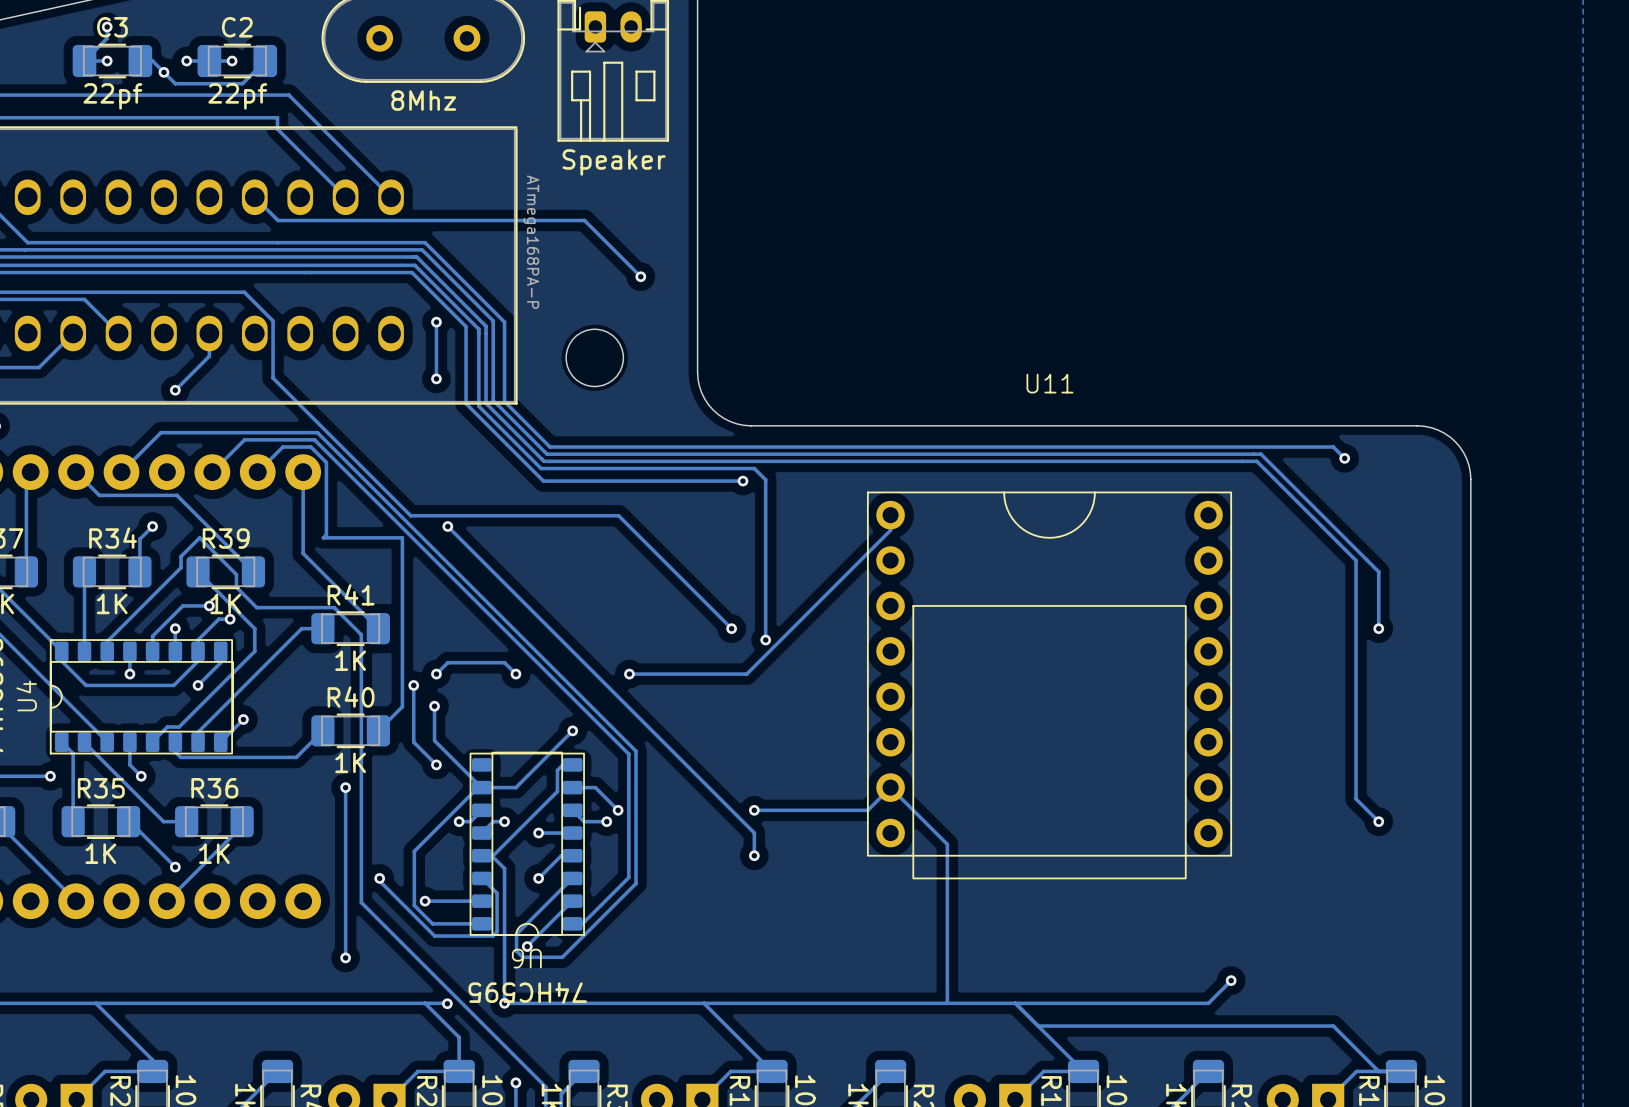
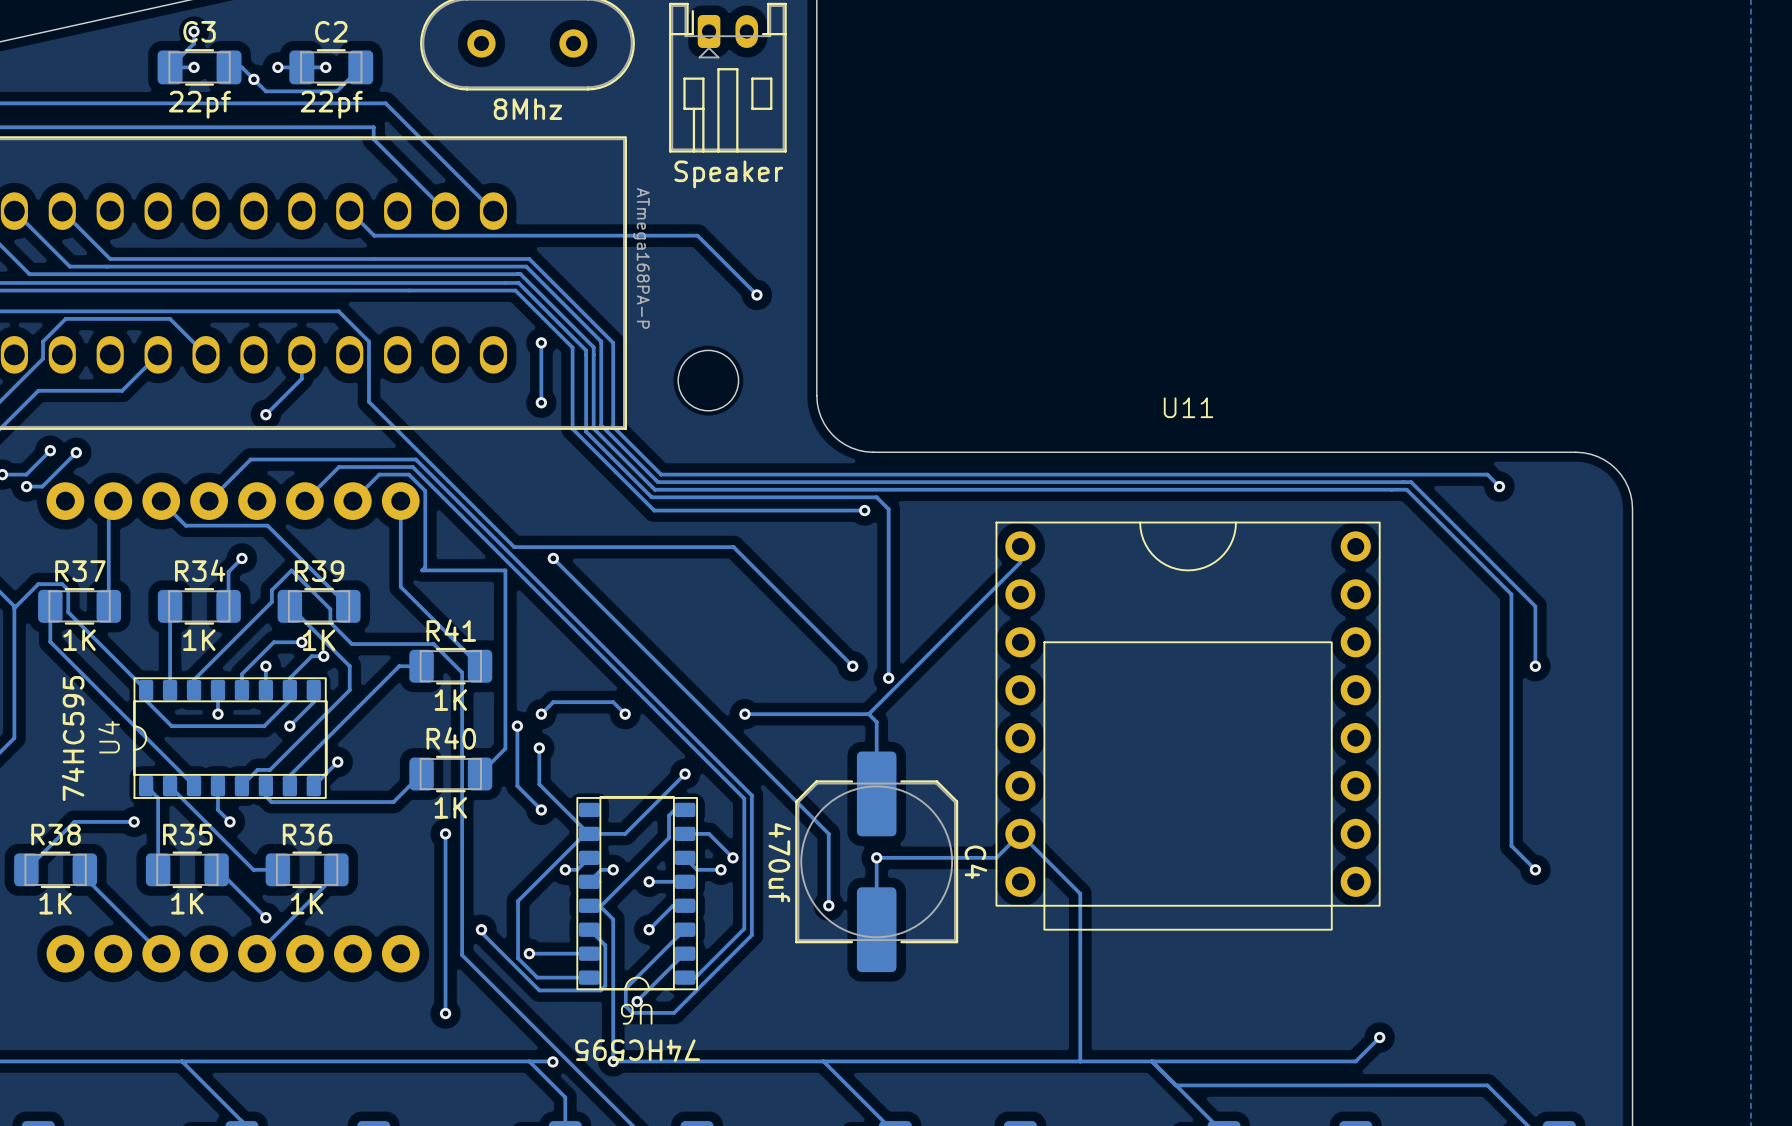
track: none -> (868, 714) (876, 722) (876, 793)
track: (708, 787) (754, 833) -> (828, 833) (828, 905)
track: none -> (876, 857) (876, 881)
C4: none -> 470uf (876, 861)
via position: (754, 855) -> (828, 905)

